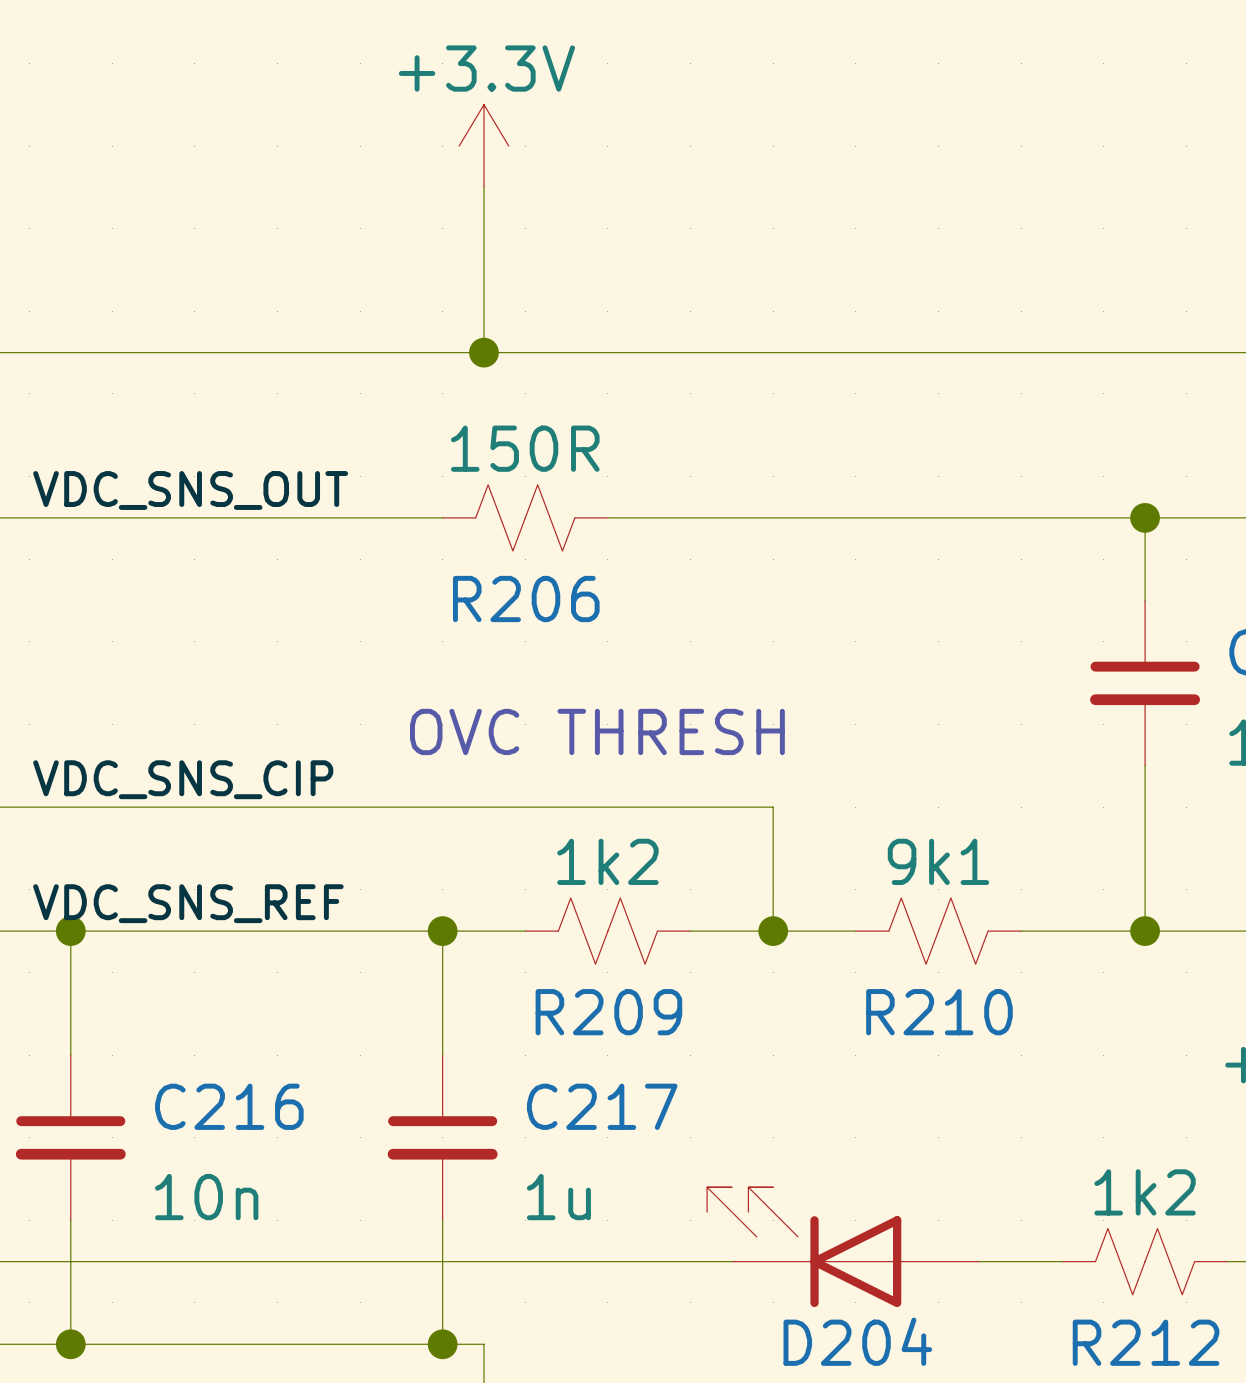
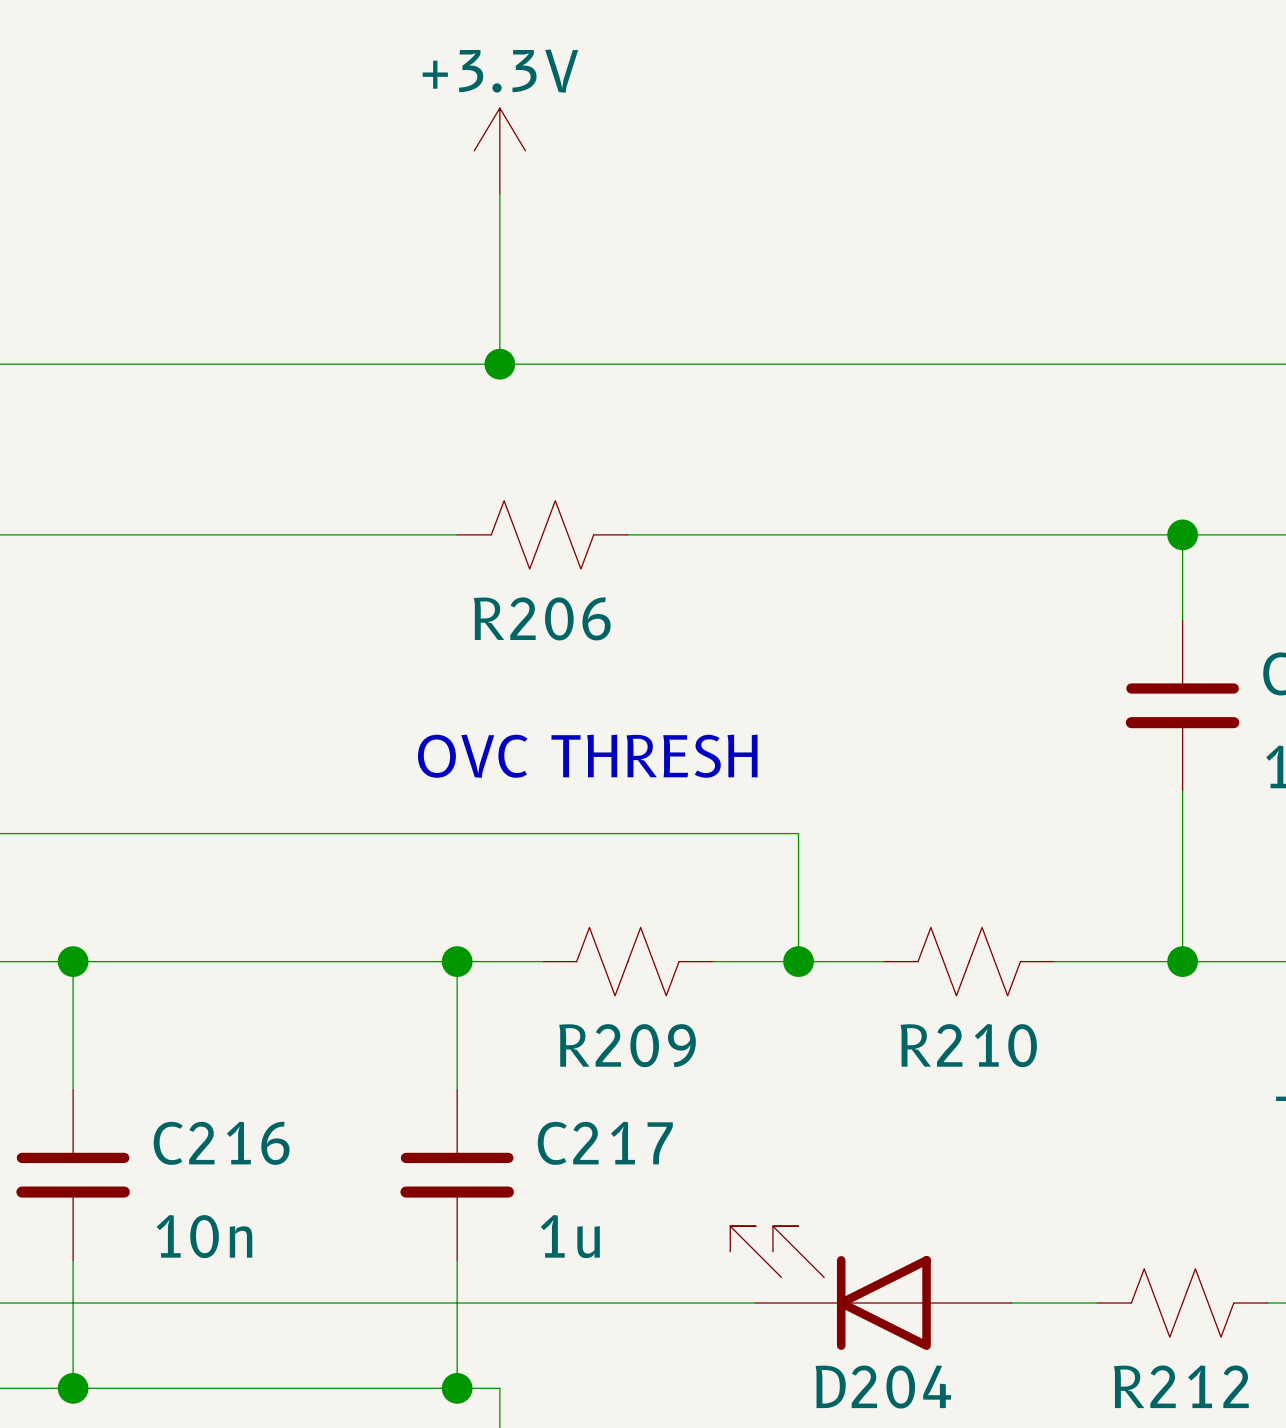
R206 value: 150R (525, 448) -> none
label: VDC_SNS_OUT (190, 490) -> none
label: VDC_SNS_CIP (183, 779) -> none
R209 value: 1k2 (607, 861) -> none
R210 value: 9k1 (938, 861) -> none
label: VDC_SNS_REF (188, 903) -> none
R212 value: 1k2 (1145, 1192) -> none

